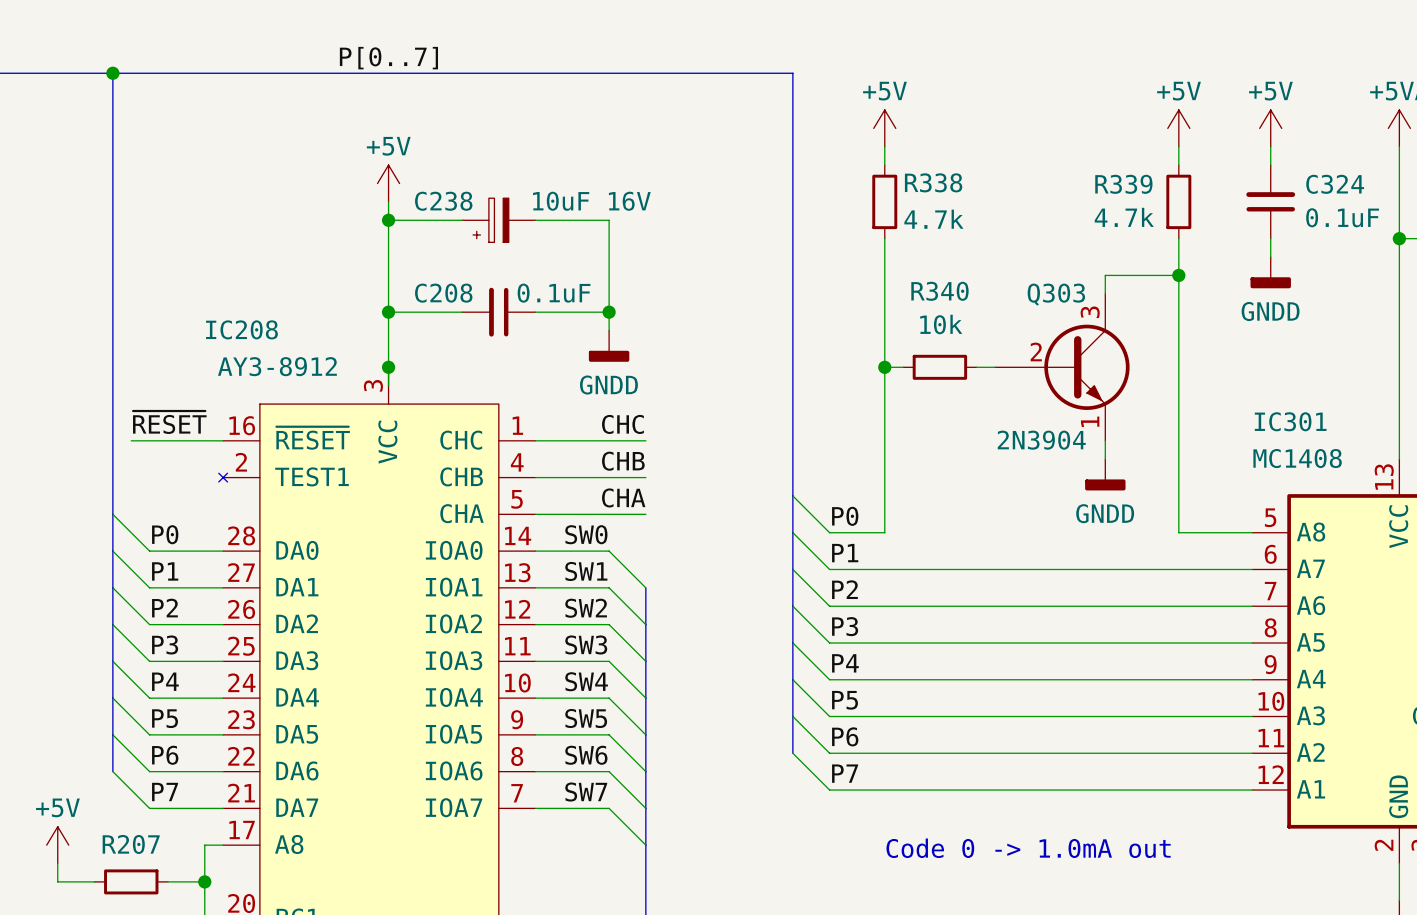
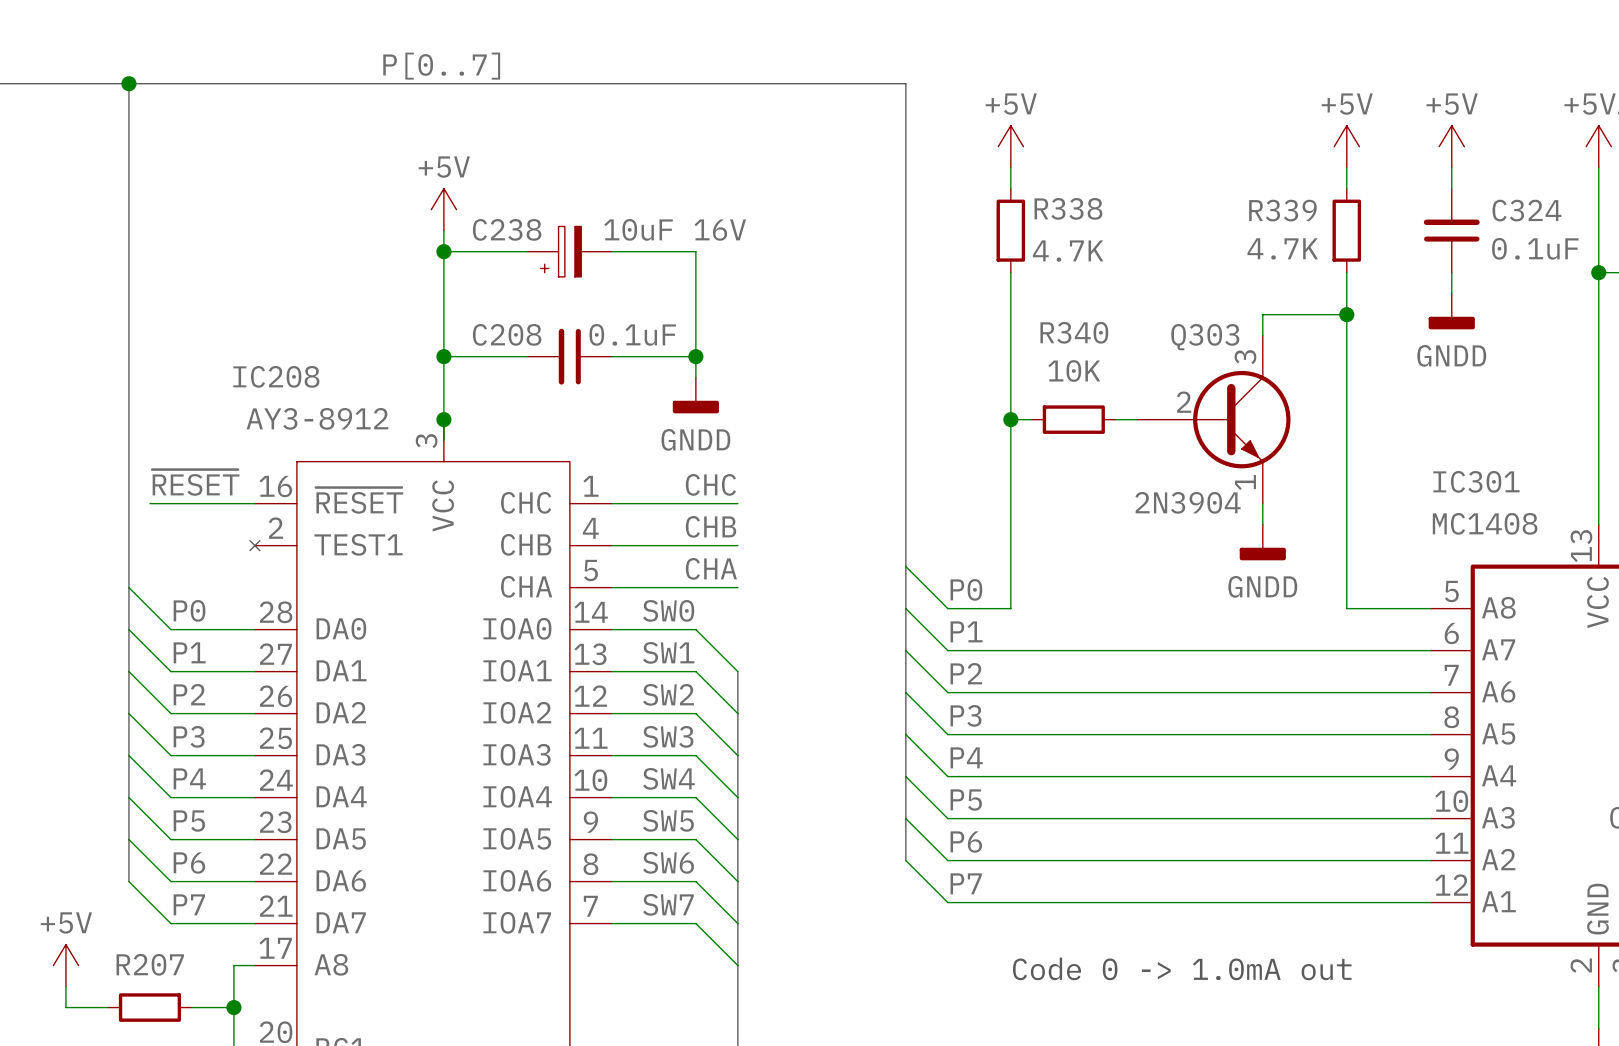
R339 value: 4.7k (1124, 217) -> 4.7K (1282, 248)
R338 value: 4.7k (933, 219) -> 4.7K (1068, 251)
R340 value: 10k (941, 324) -> 10K (1074, 370)

